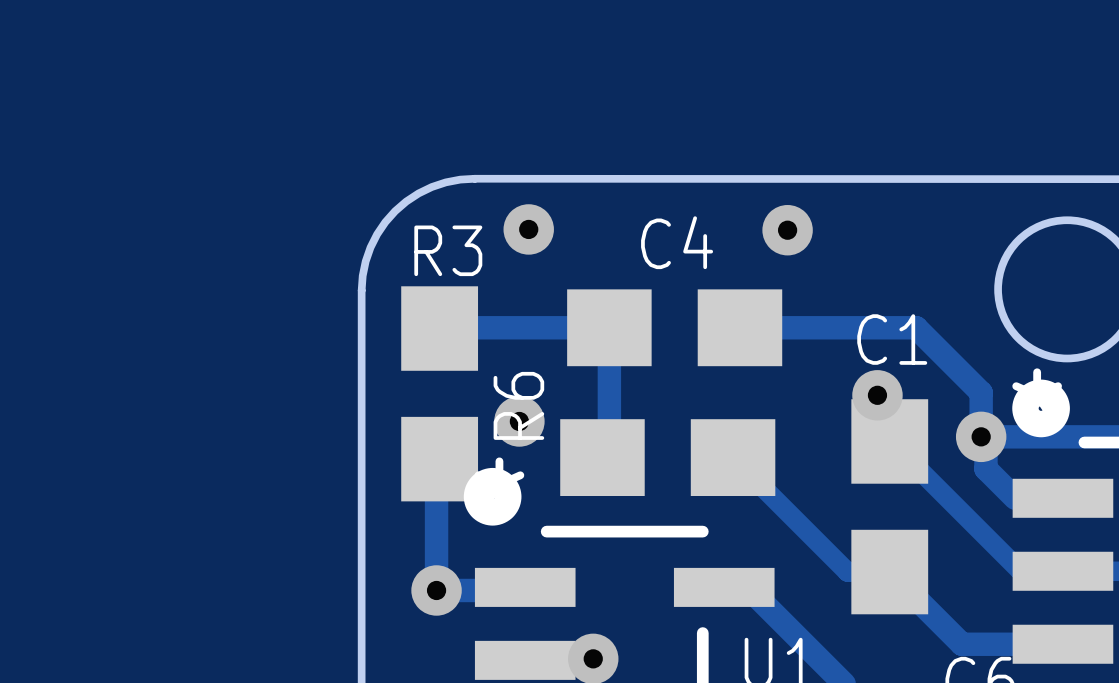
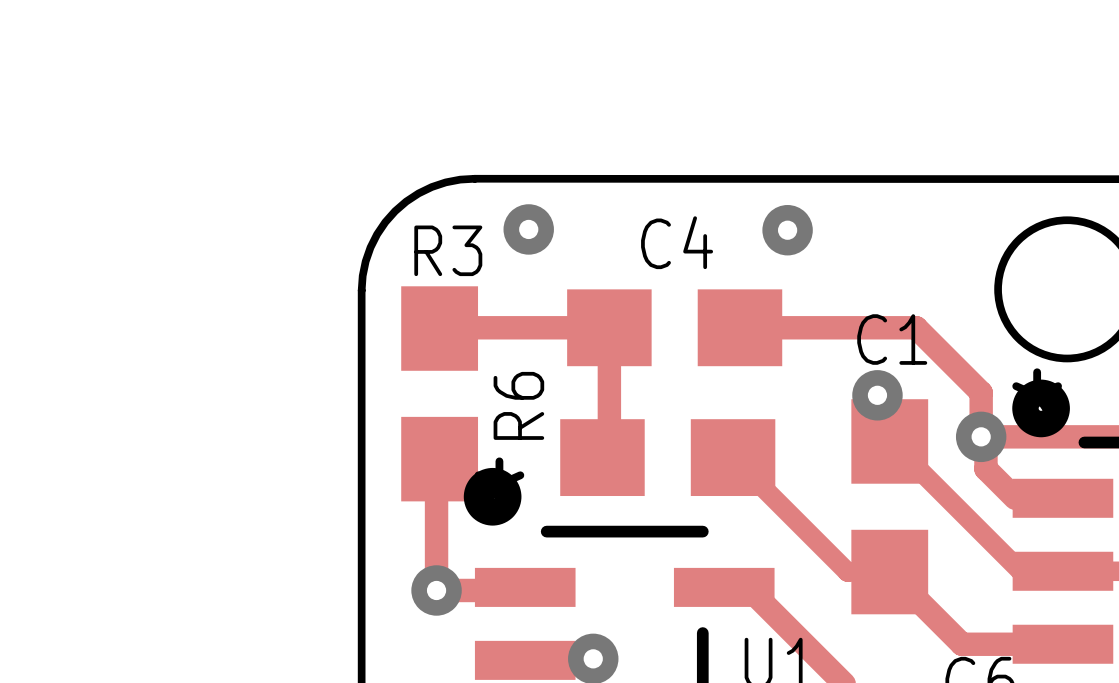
via: (519, 421) -> none

